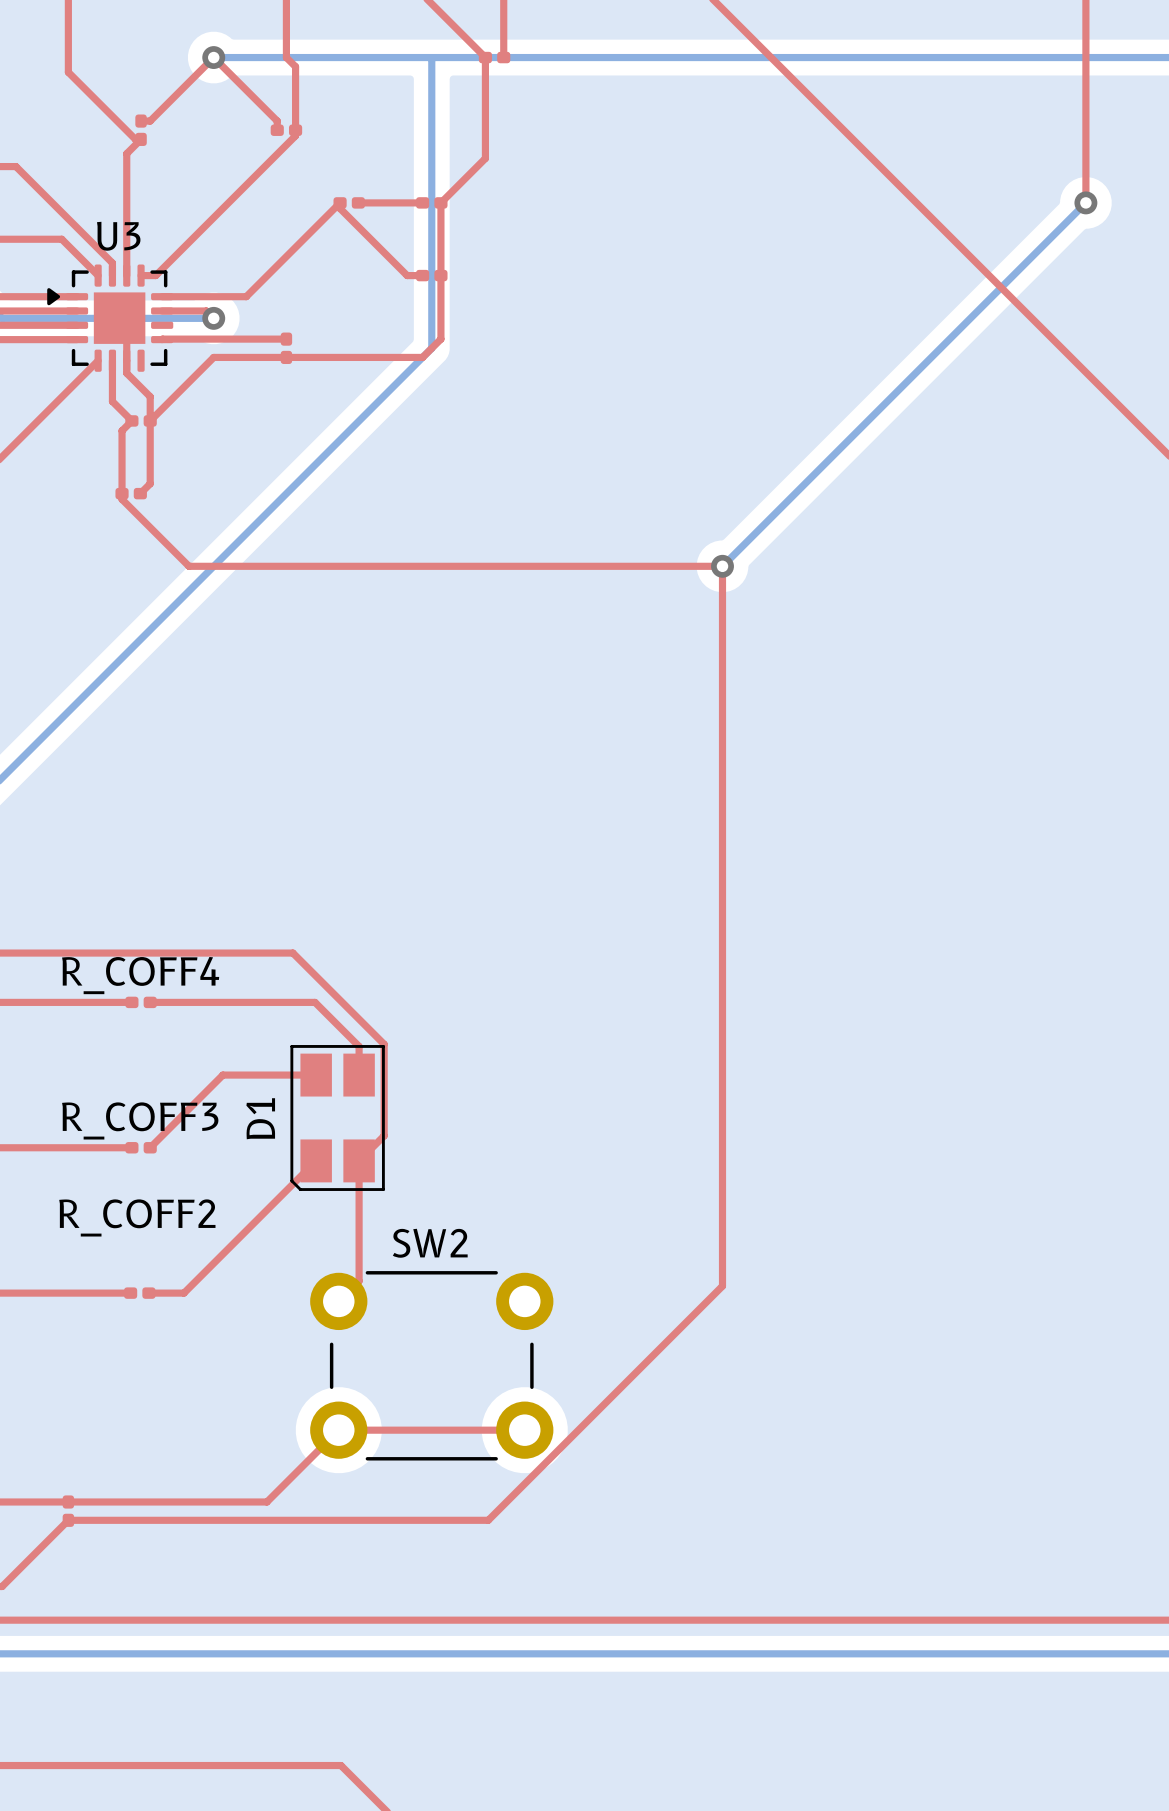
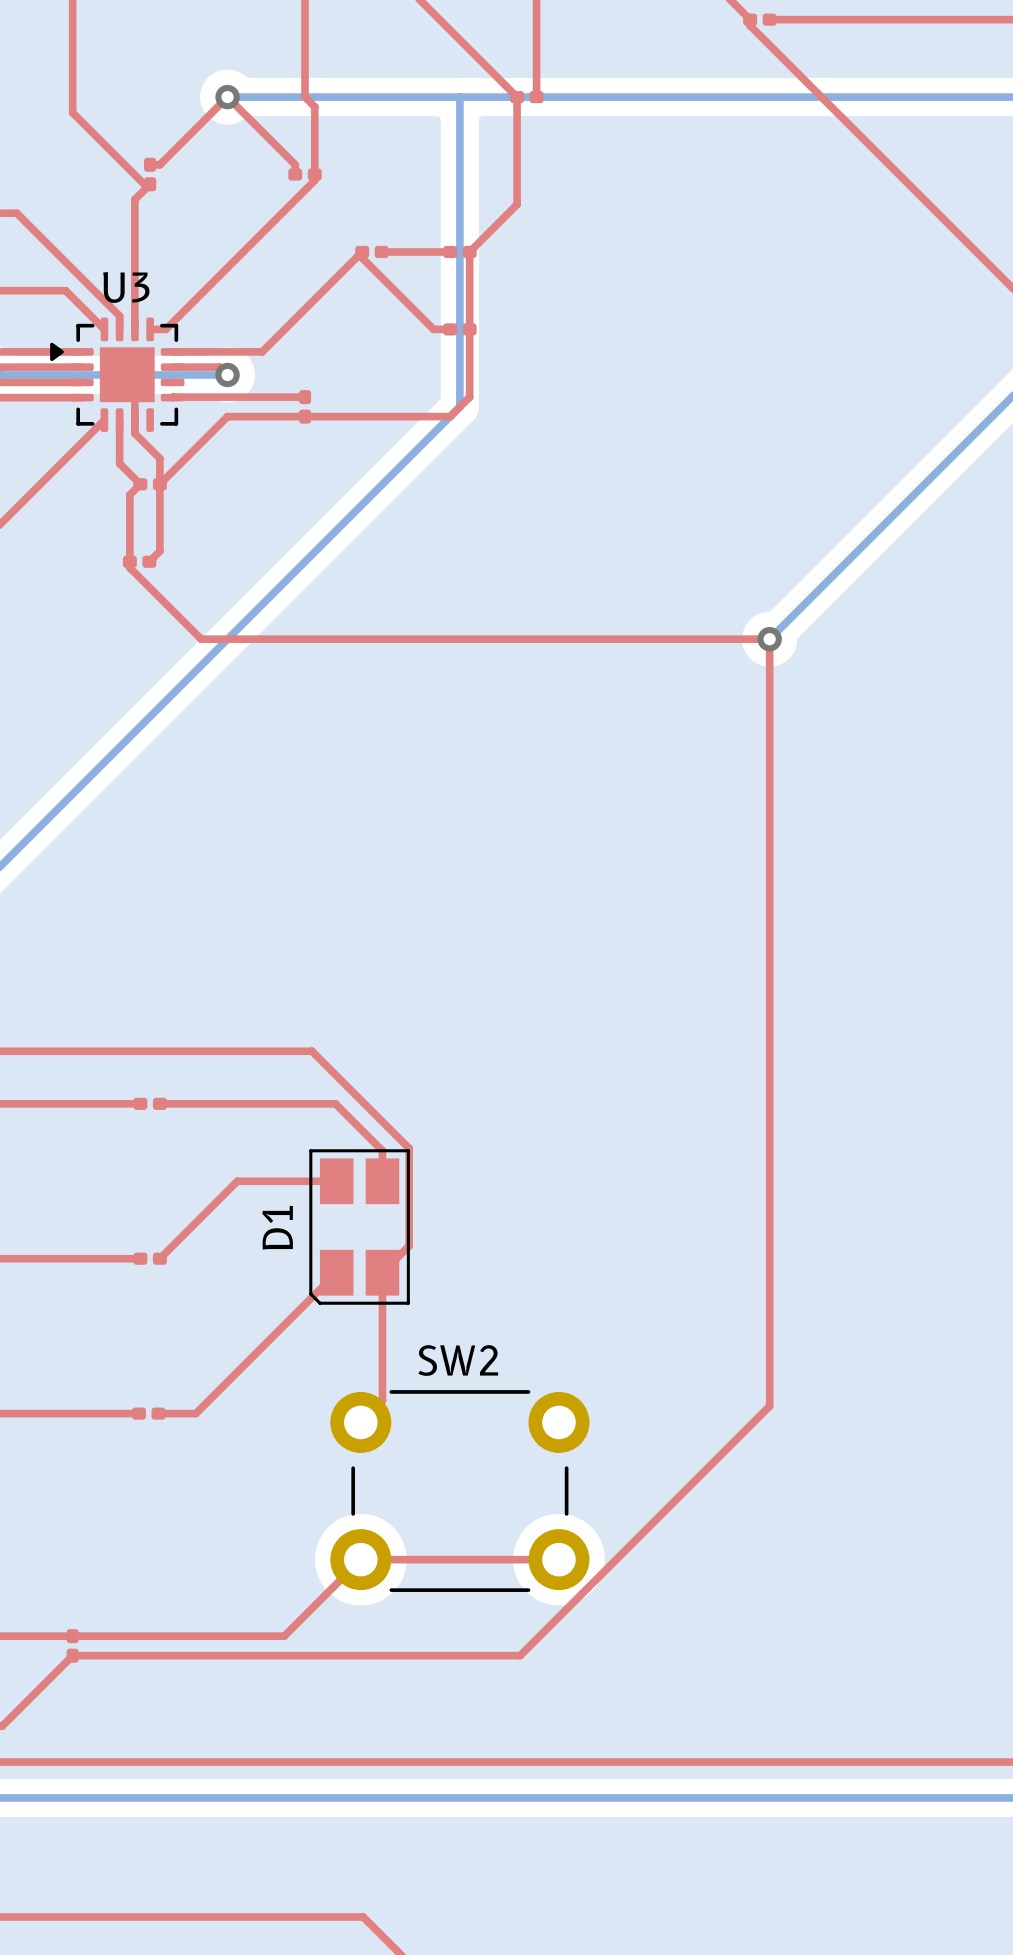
R_COFF4 name: R_COFF4 (140, 975) -> none
R_COFF3 name: R_COFF3 (140, 1120) -> none
R_COFF2 name: R_COFF2 (137, 1217) -> none

